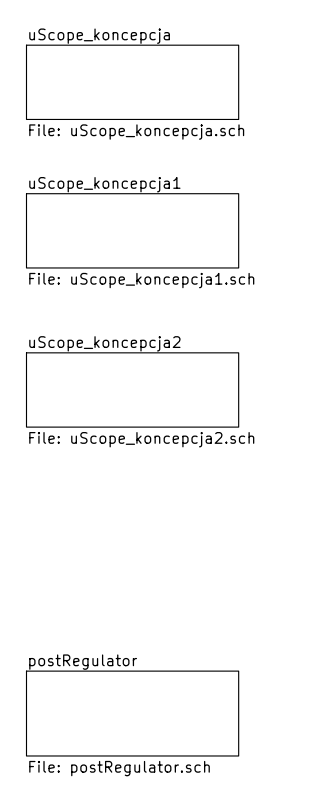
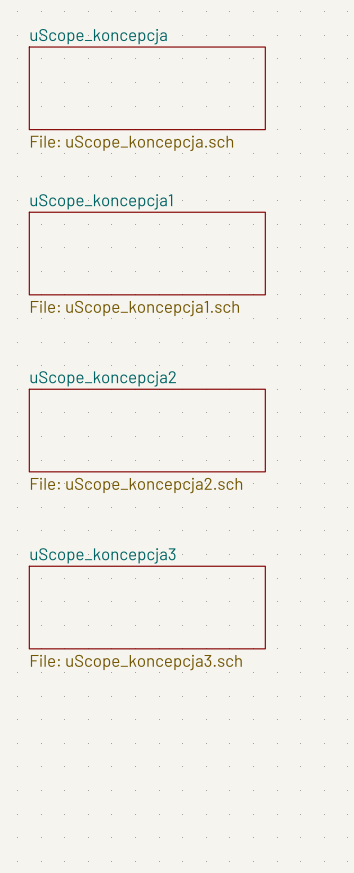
sheet uScope_koncepcja3: none -> File: uScope_koncepcja3.sch (147, 607)
sheet postRegulator: File: postRegulator.sch (132, 713) -> none

